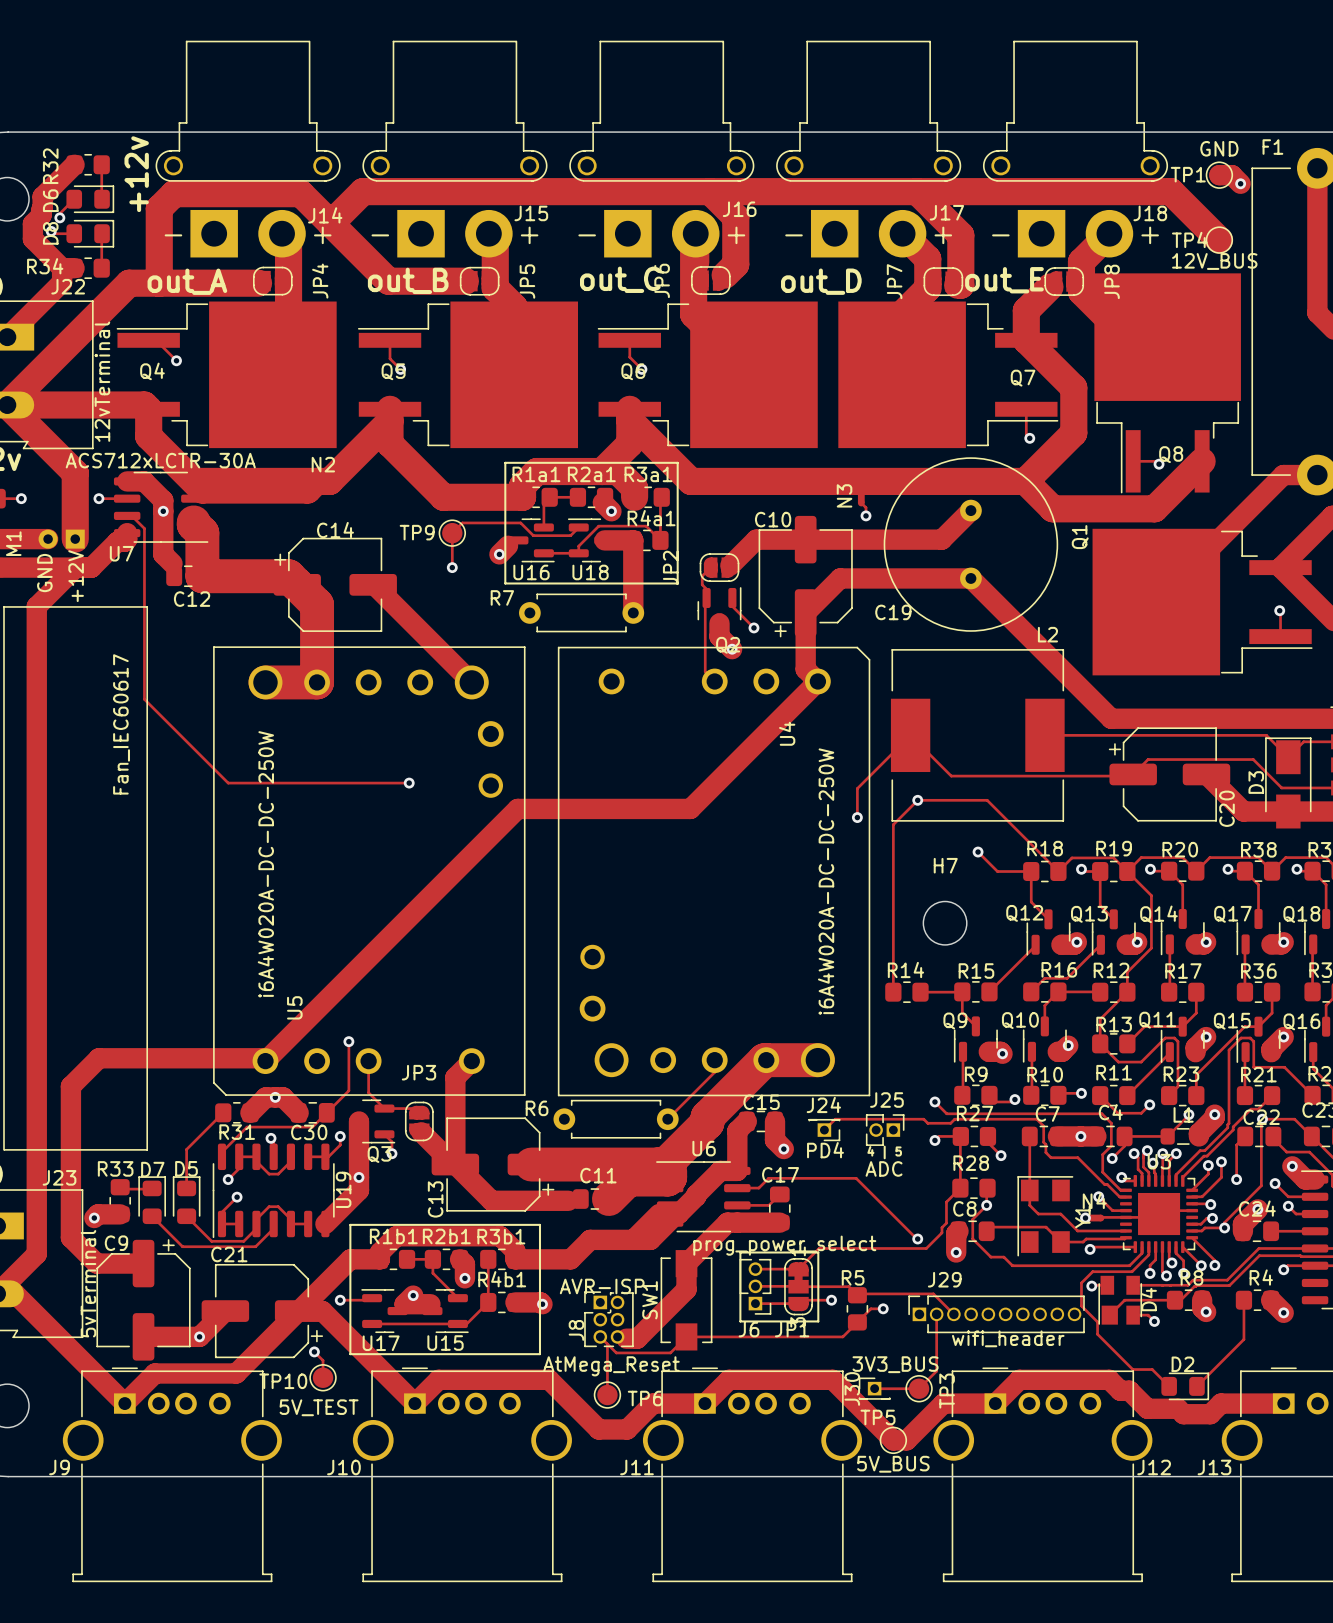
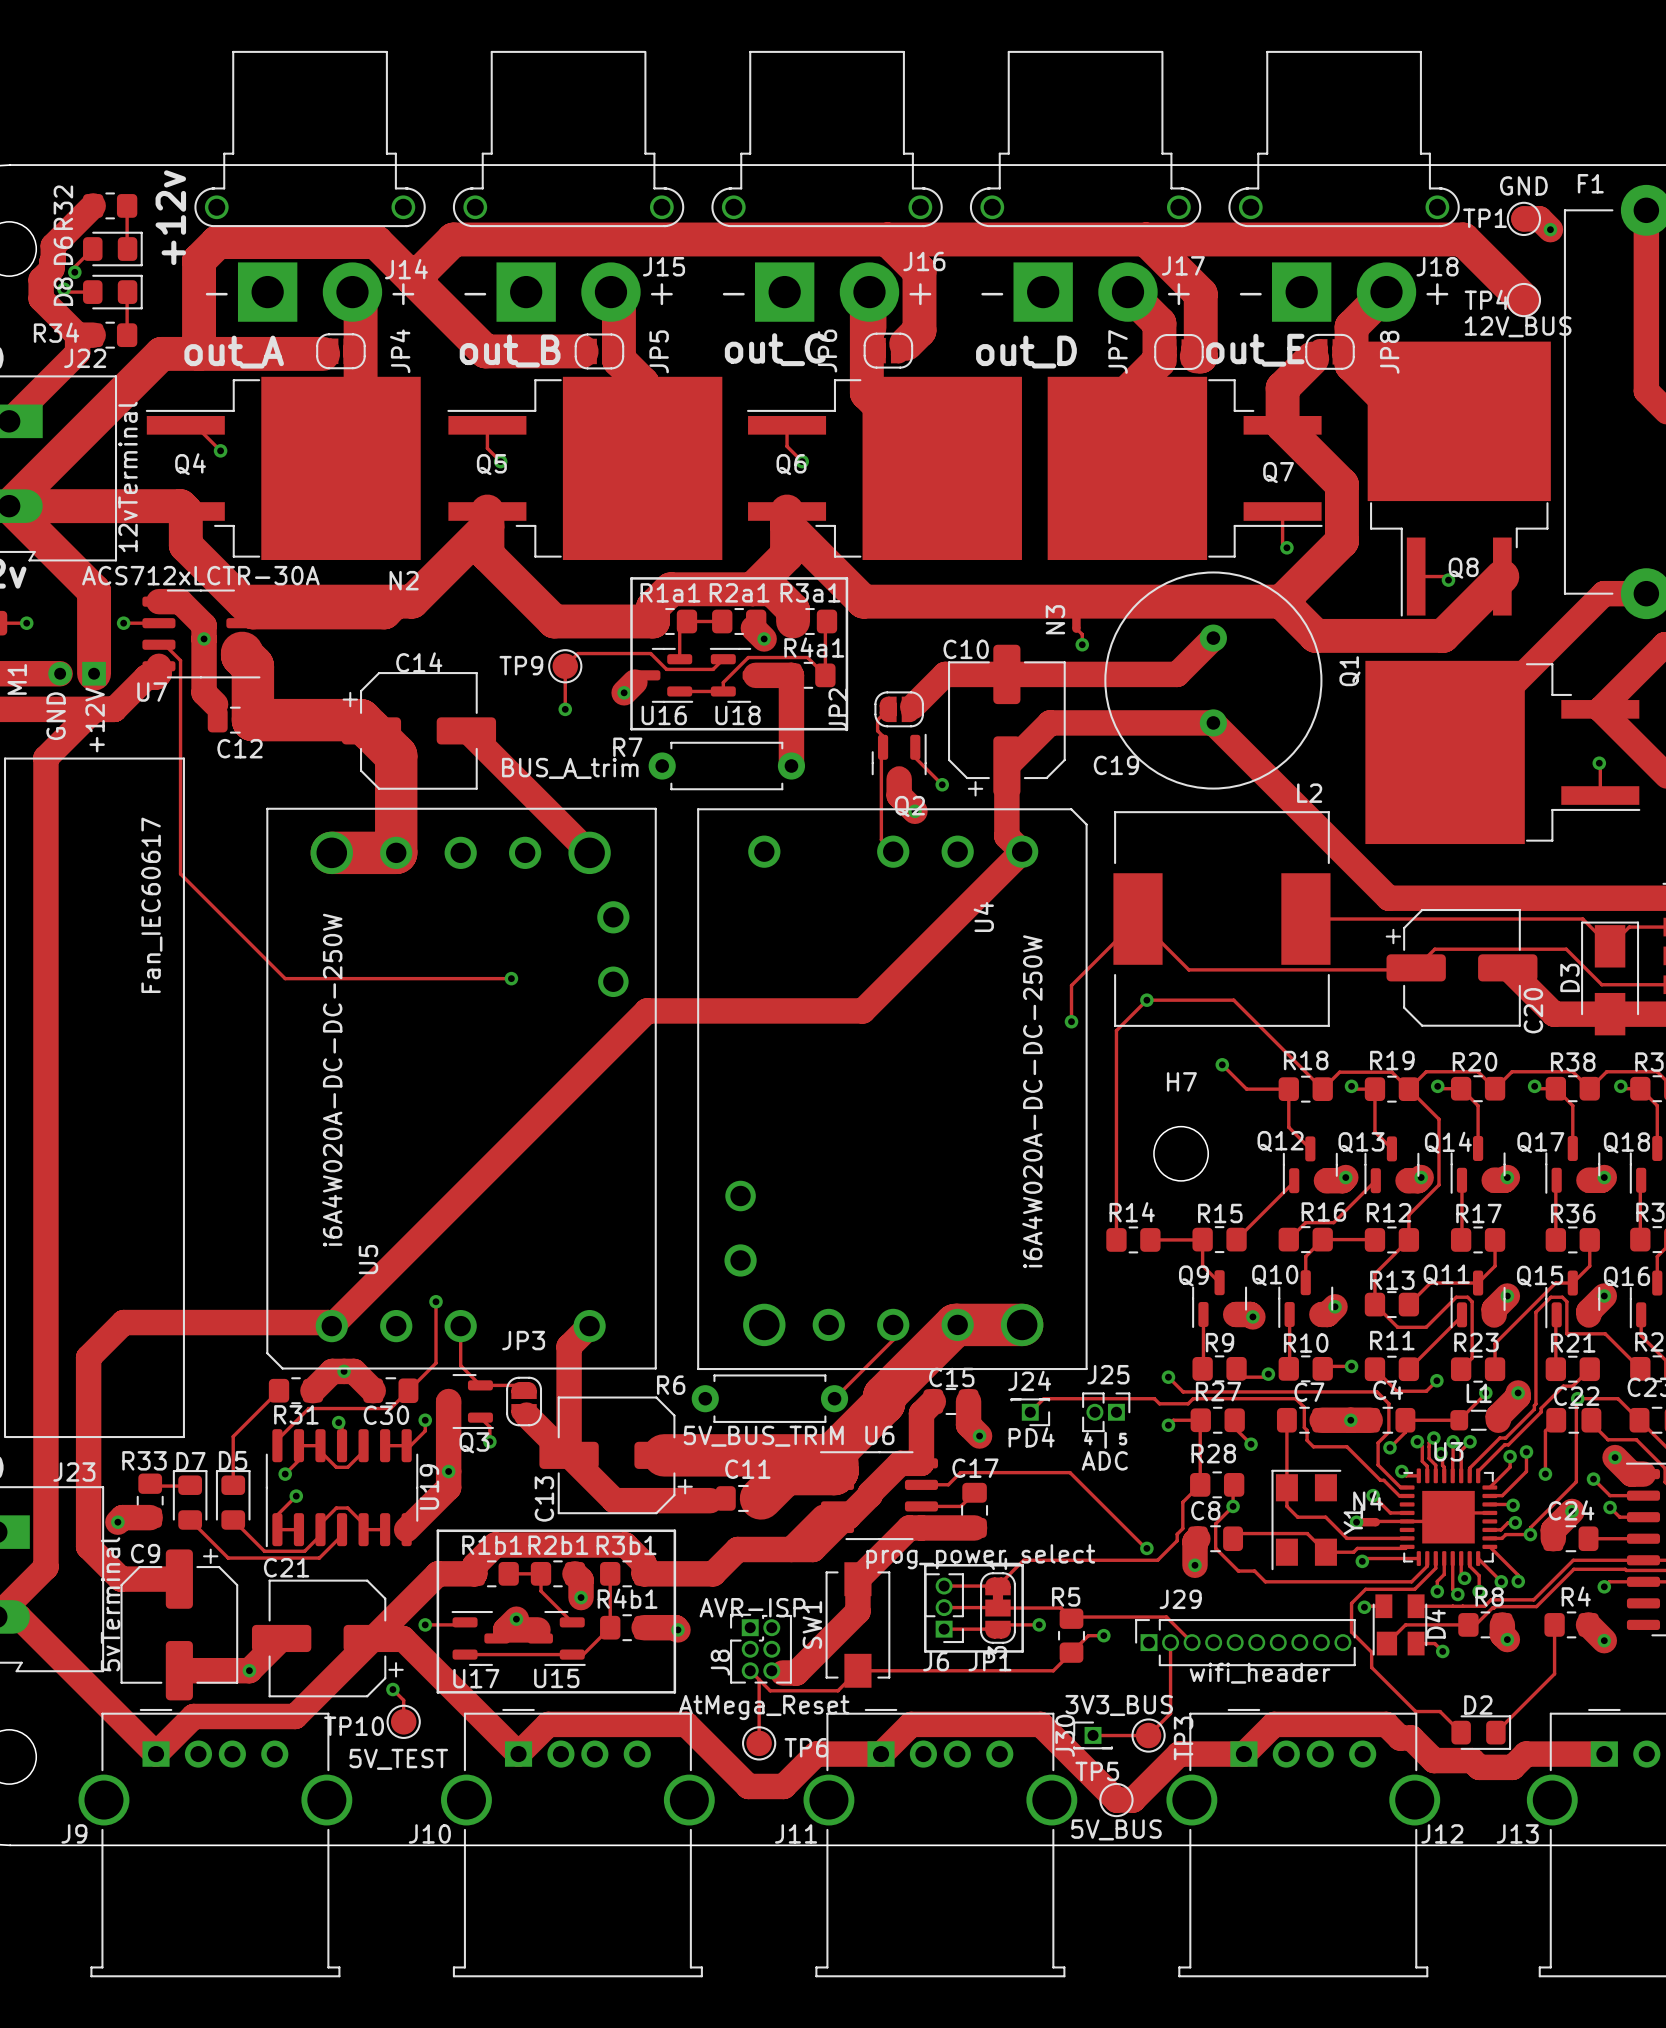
R7 value: none -> BUS_A_trim (570, 768)
R6 value: none -> 5V_BUS_TRIM (763, 1436)

